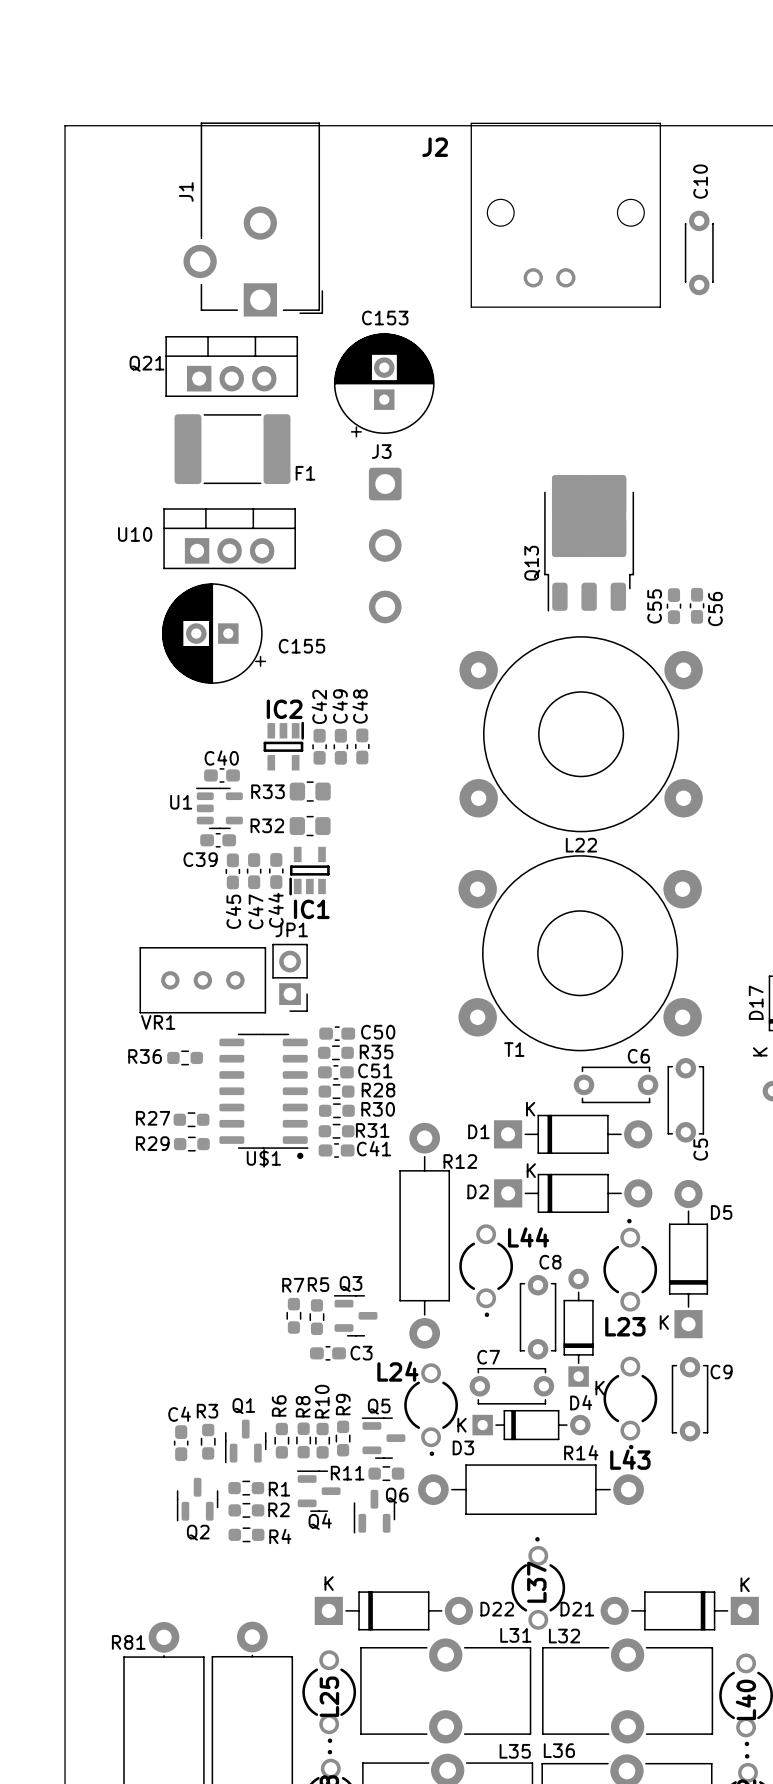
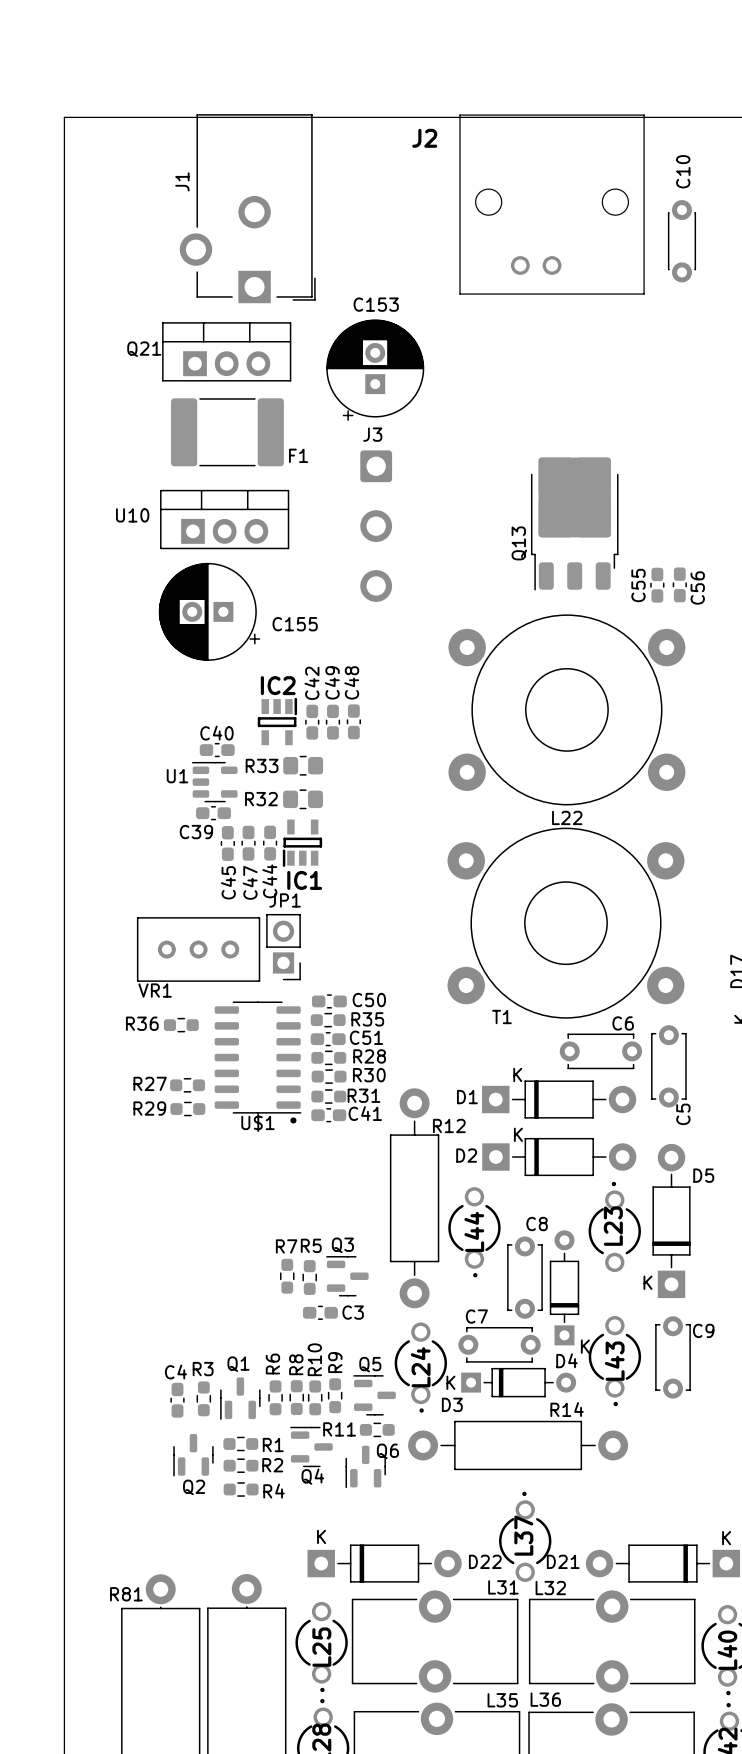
L44 name rotation: 0° (528, 1237) -> 90° counterclockwise (474, 1231)
L23 name rotation: 0° (625, 1326) -> 90° counterclockwise (613, 1226)
L23 name position: L23 (625, 1326) -> L23 (613, 1226)
L24 name rotation: 0° (397, 1371) -> 90° counterclockwise (420, 1367)
L43 name rotation: 0° (630, 1459) -> 90° counterclockwise (614, 1361)
L43 name position: L43 (630, 1459) -> L43 (614, 1361)

